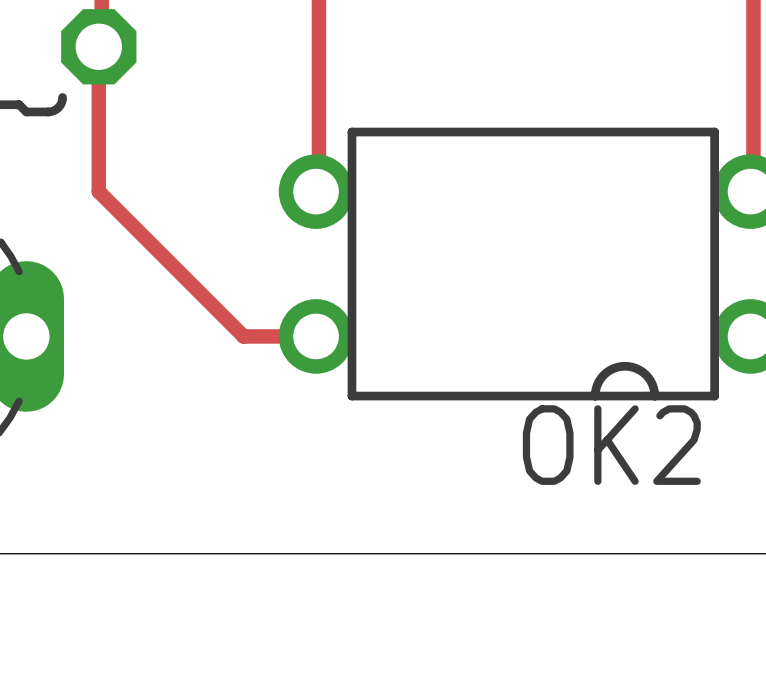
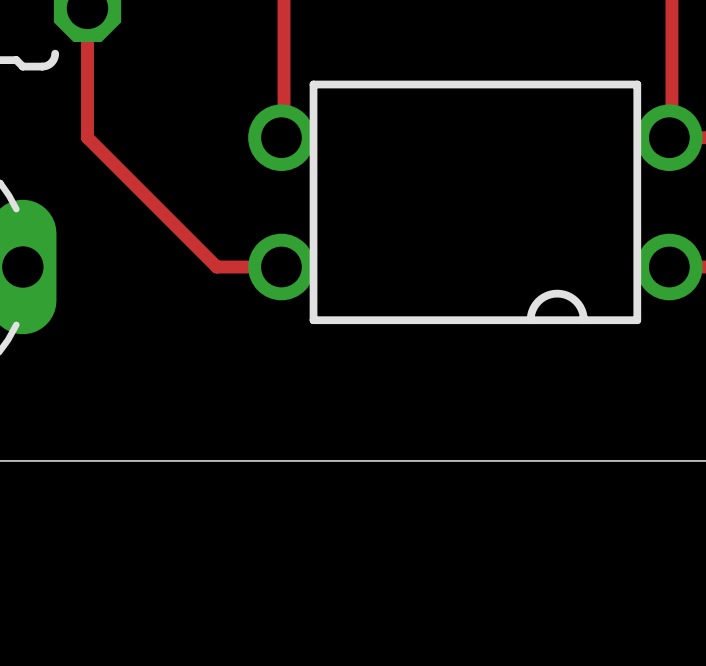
OK2 name: OK2 (611, 445) -> none

